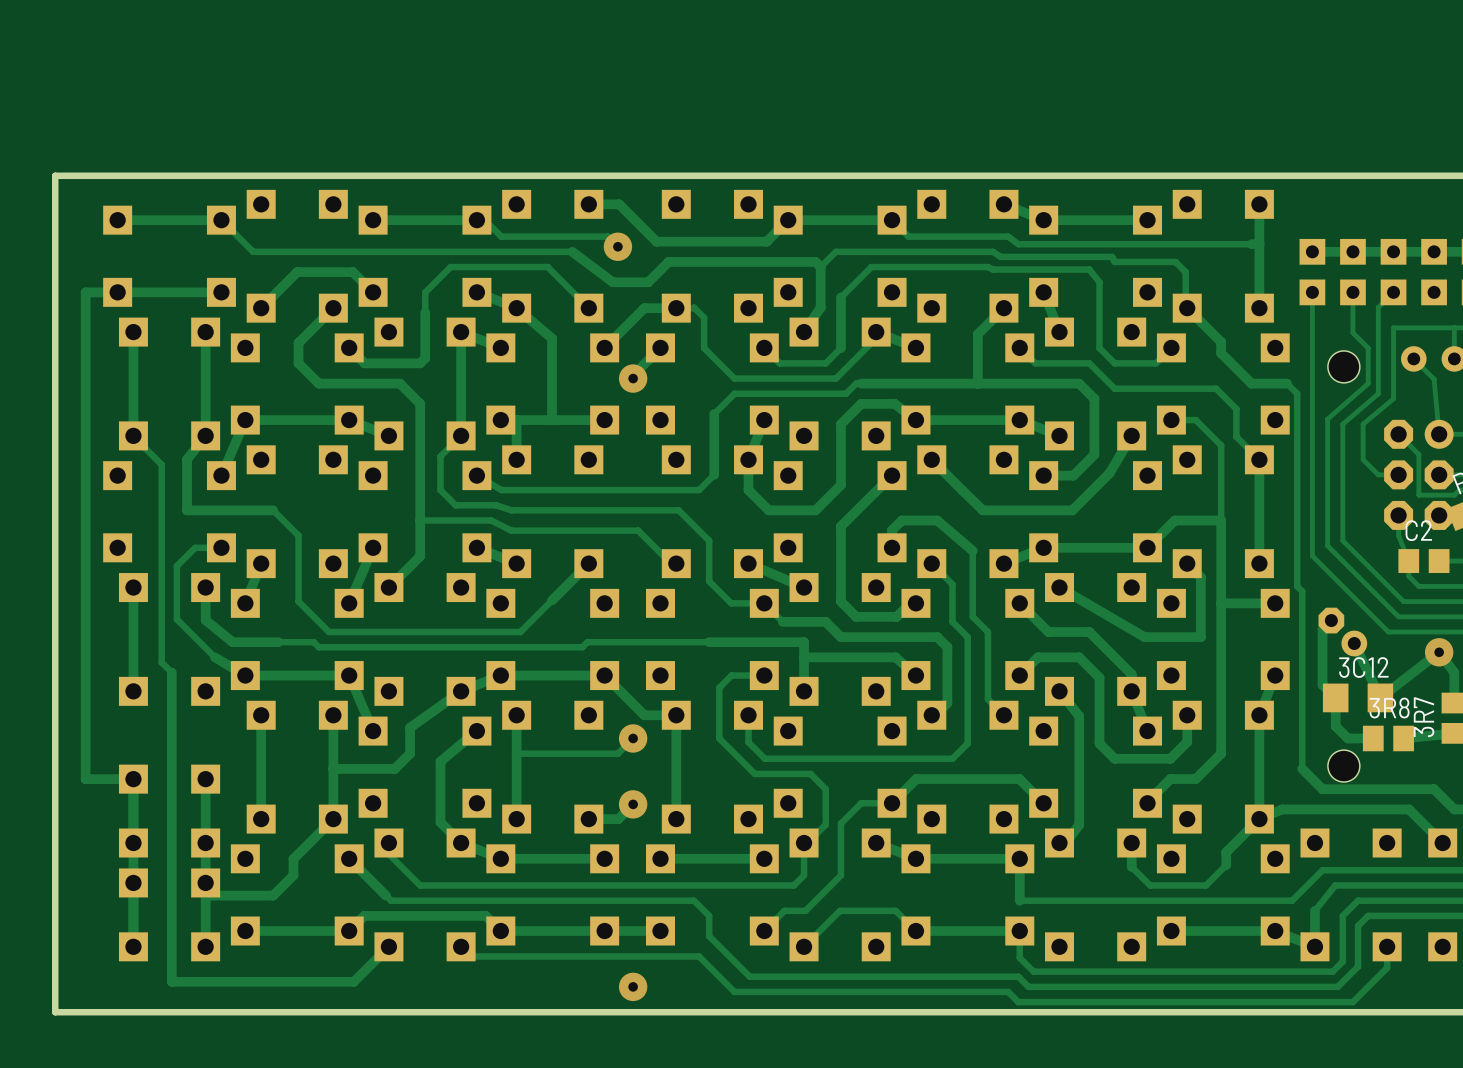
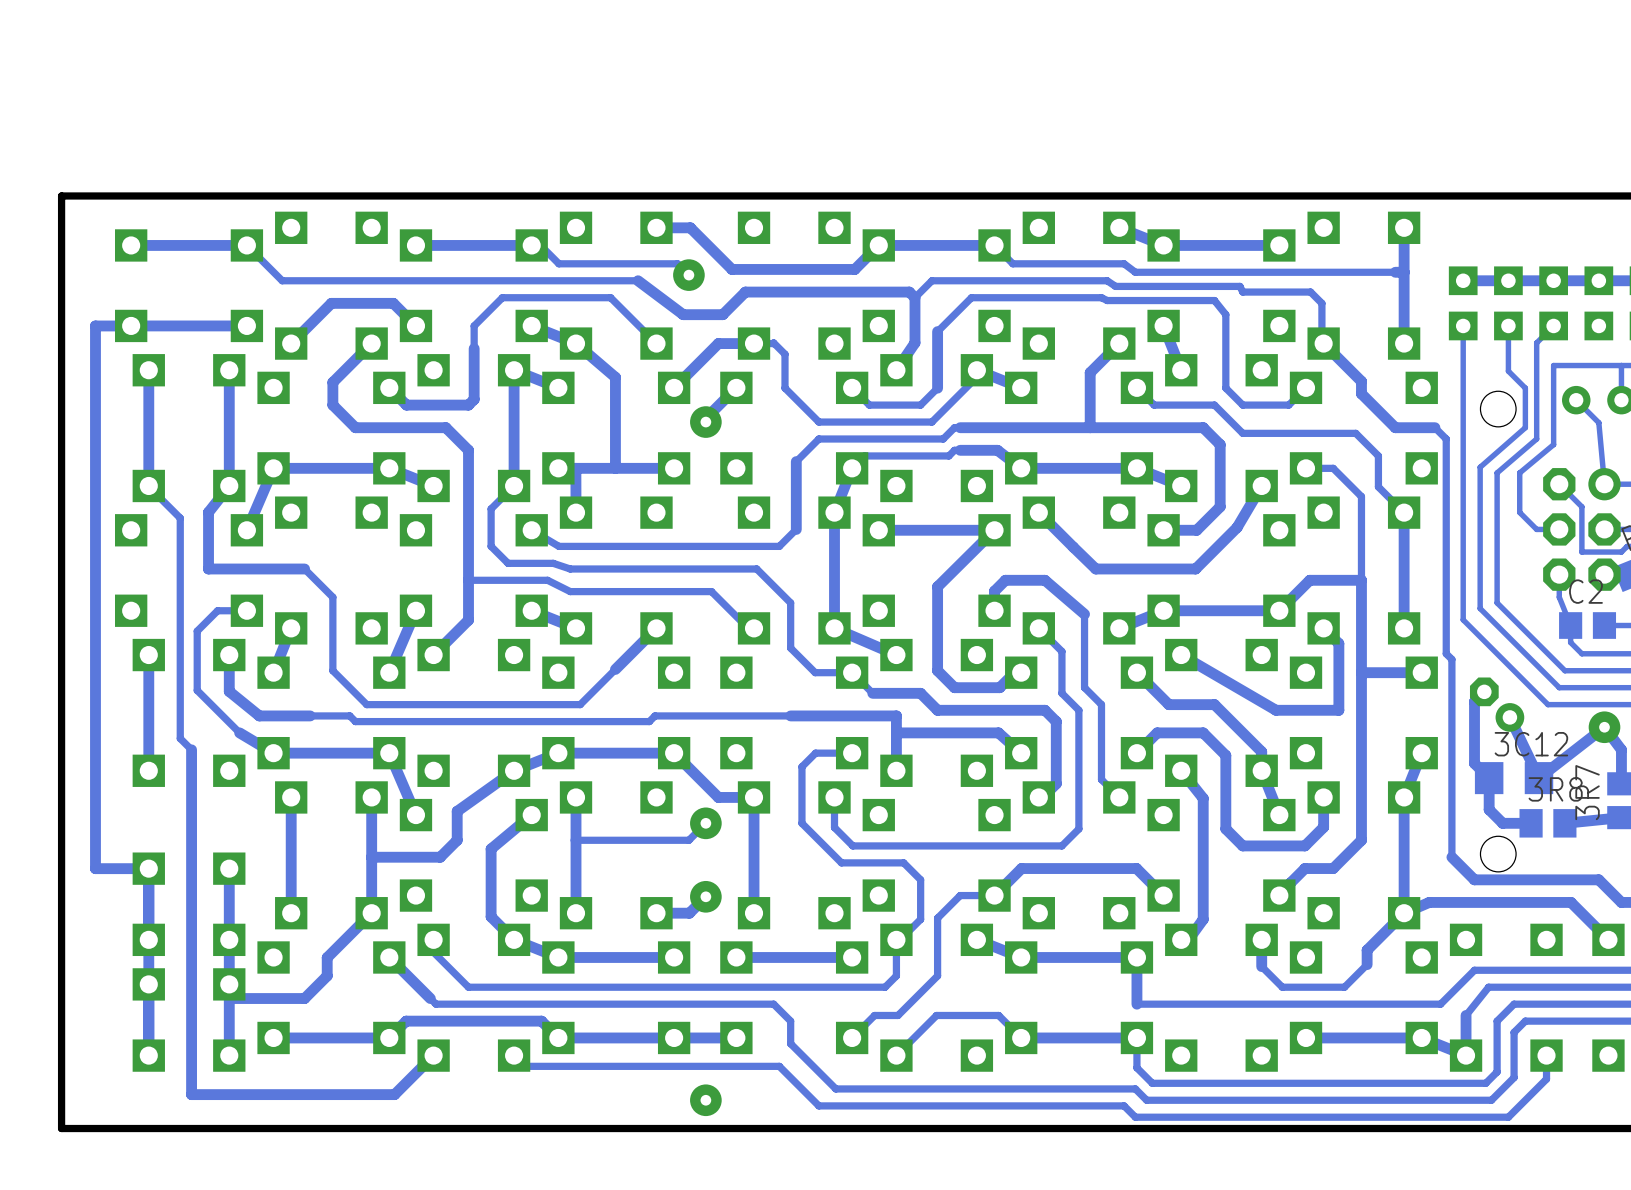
track: (861, 403) (840, 424) (840, 485) (815, 510) (768, 510) (748, 490) -> (960, 450) (954, 450) (948, 455) (864, 455) (852, 468)
track: none -> (994, 530) (878, 530)
track: none -> (834, 546) (834, 628)

